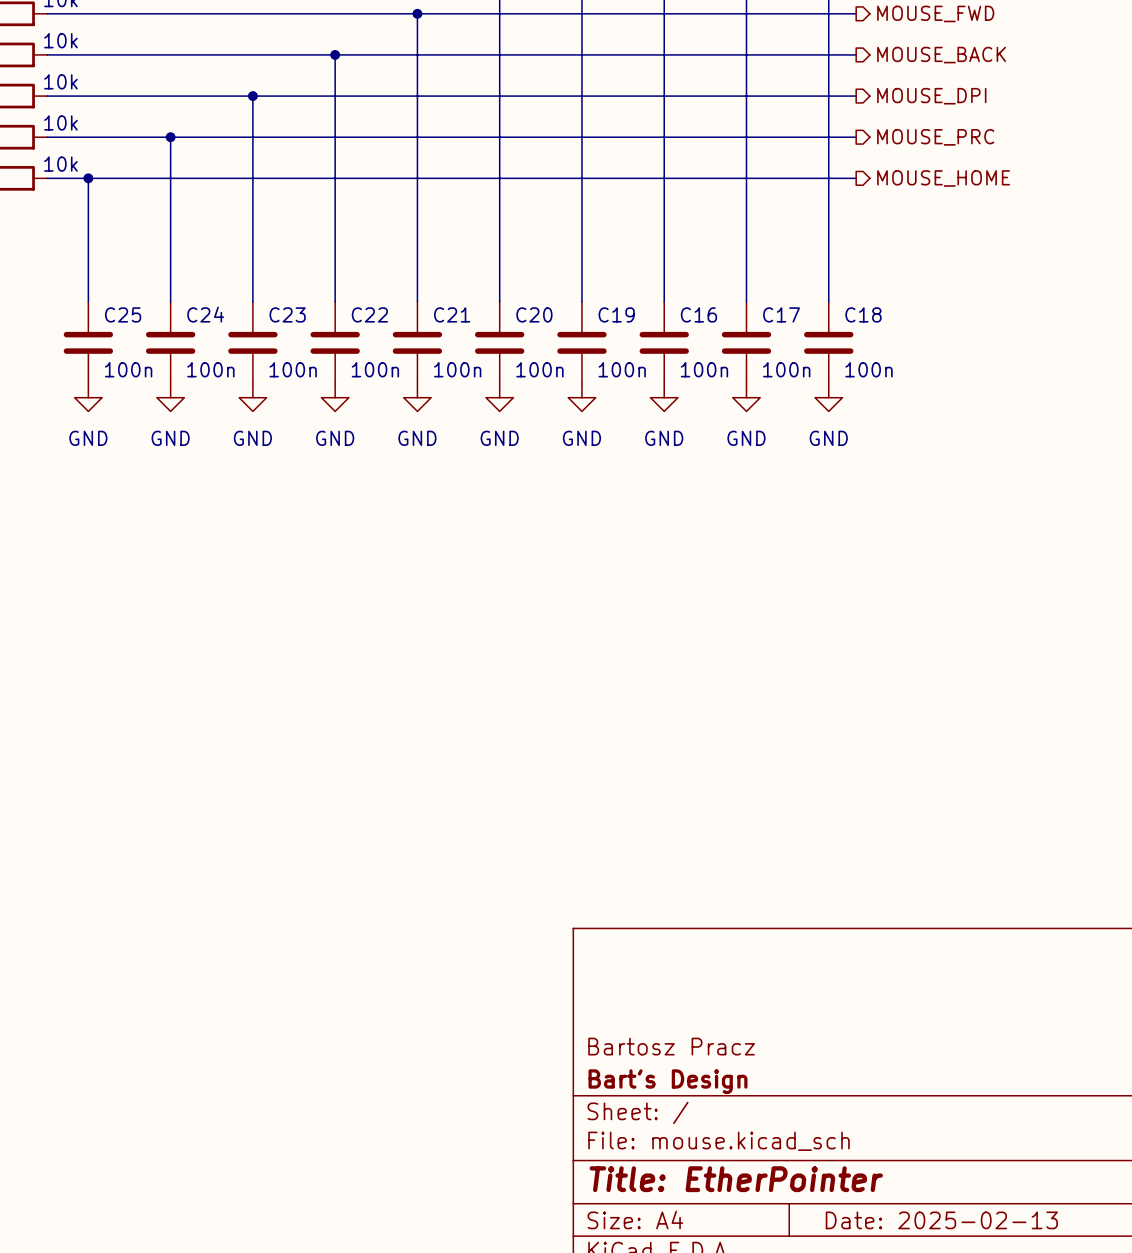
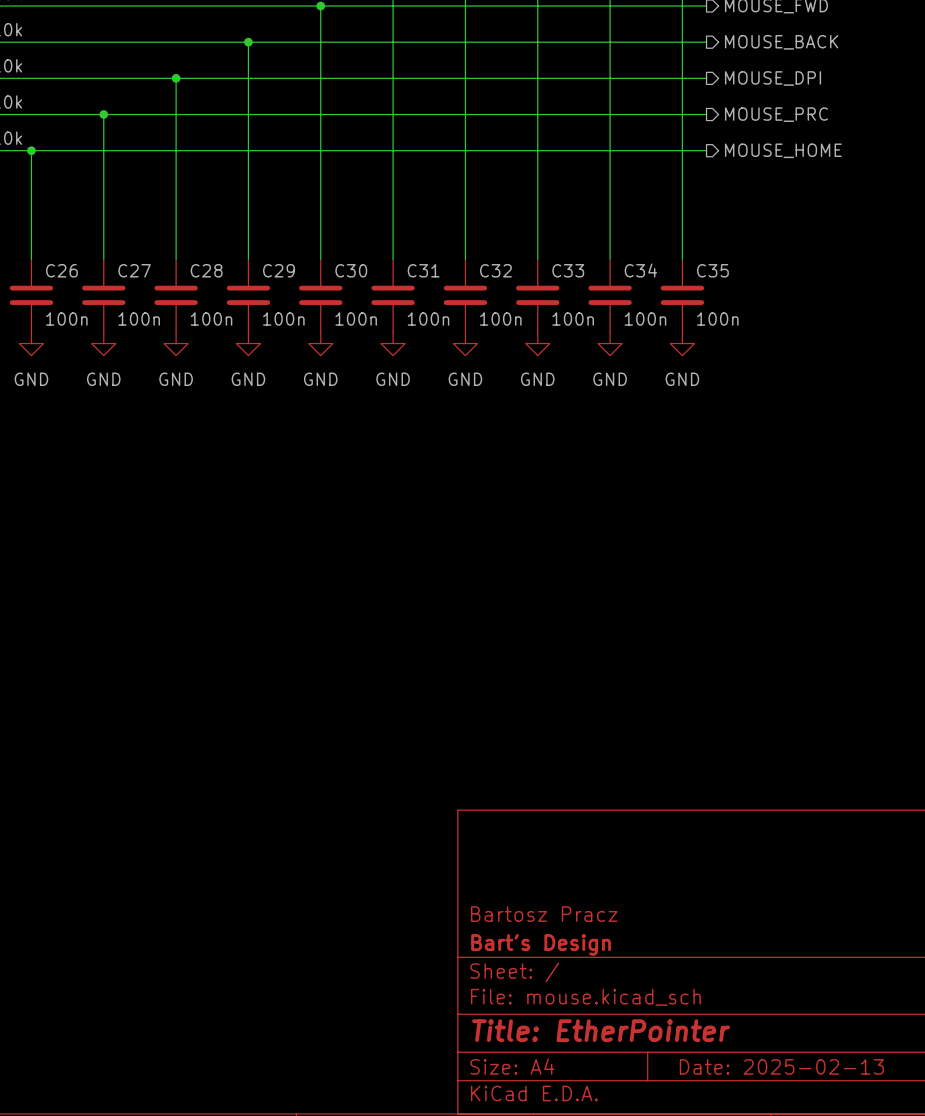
C25 name: C25 (123, 314) -> C26 (61, 270)
C24 name: C24 (205, 314) -> C27 (134, 270)
C23 name: C23 (287, 314) -> C28 (206, 270)
C22 name: C22 (369, 314) -> C29 (278, 270)
C21 name: C21 (452, 314) -> C30 (351, 270)
C20 name: C20 (534, 314) -> C31 (423, 270)
C19 name: C19 (616, 314) -> C32 (495, 270)
C16 name: C16 (698, 314) -> C33 (568, 270)
C17 name: C17 (781, 314) -> C34 (640, 270)
C18 name: C18 (863, 314) -> C35 (712, 270)

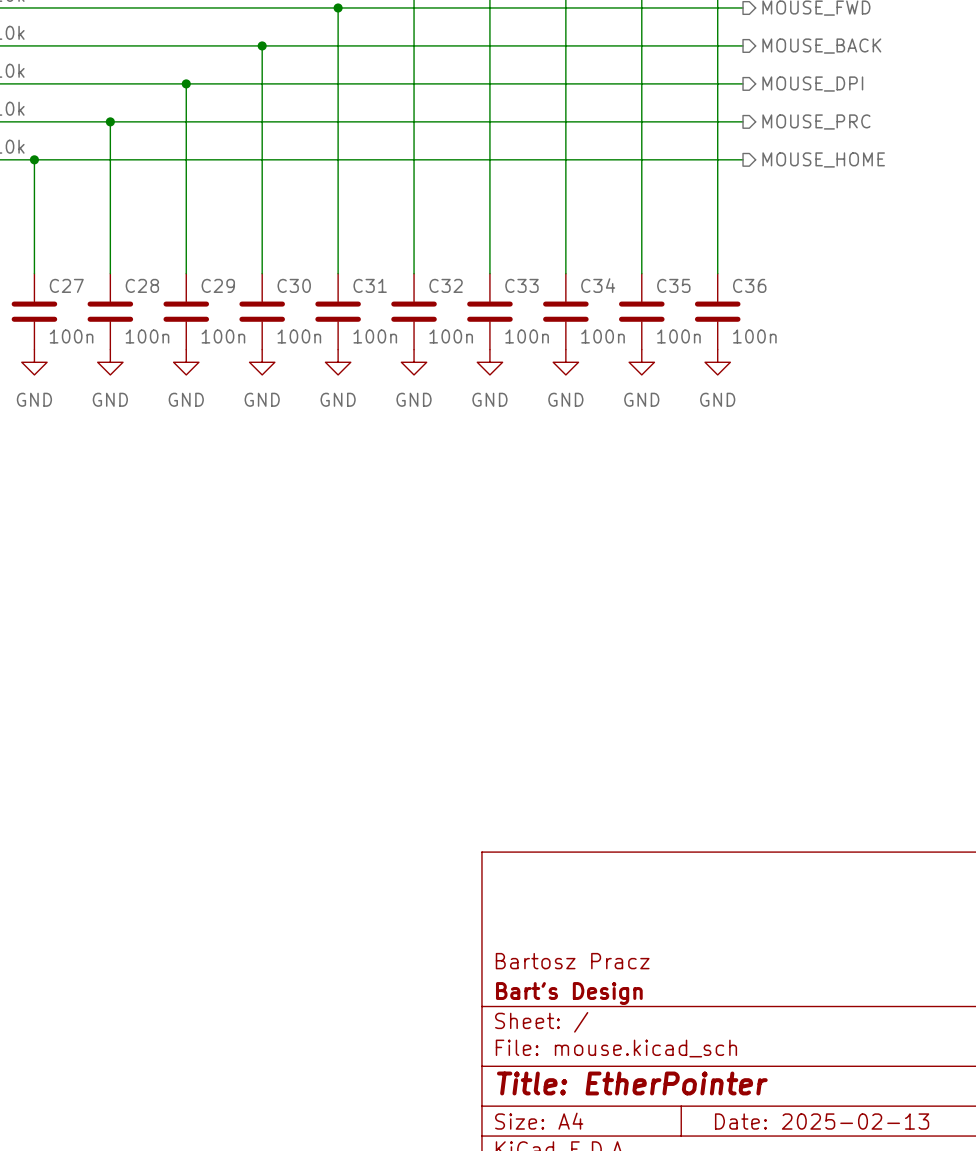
C26 name: C26 (61, 270) -> C27 (66, 285)
C27 name: C27 (134, 270) -> C28 (142, 285)
C28 name: C28 (206, 270) -> C29 (218, 285)
C29 name: C29 (278, 270) -> C30 (294, 285)
C30 name: C30 (351, 270) -> C31 (370, 285)
C31 name: C31 (423, 270) -> C32 (446, 285)
C32 name: C32 (495, 270) -> C33 (521, 285)
C33 name: C33 (568, 270) -> C34 (598, 285)
C34 name: C34 (640, 270) -> C35 (673, 285)
C35 name: C35 (712, 270) -> C36 (749, 285)

